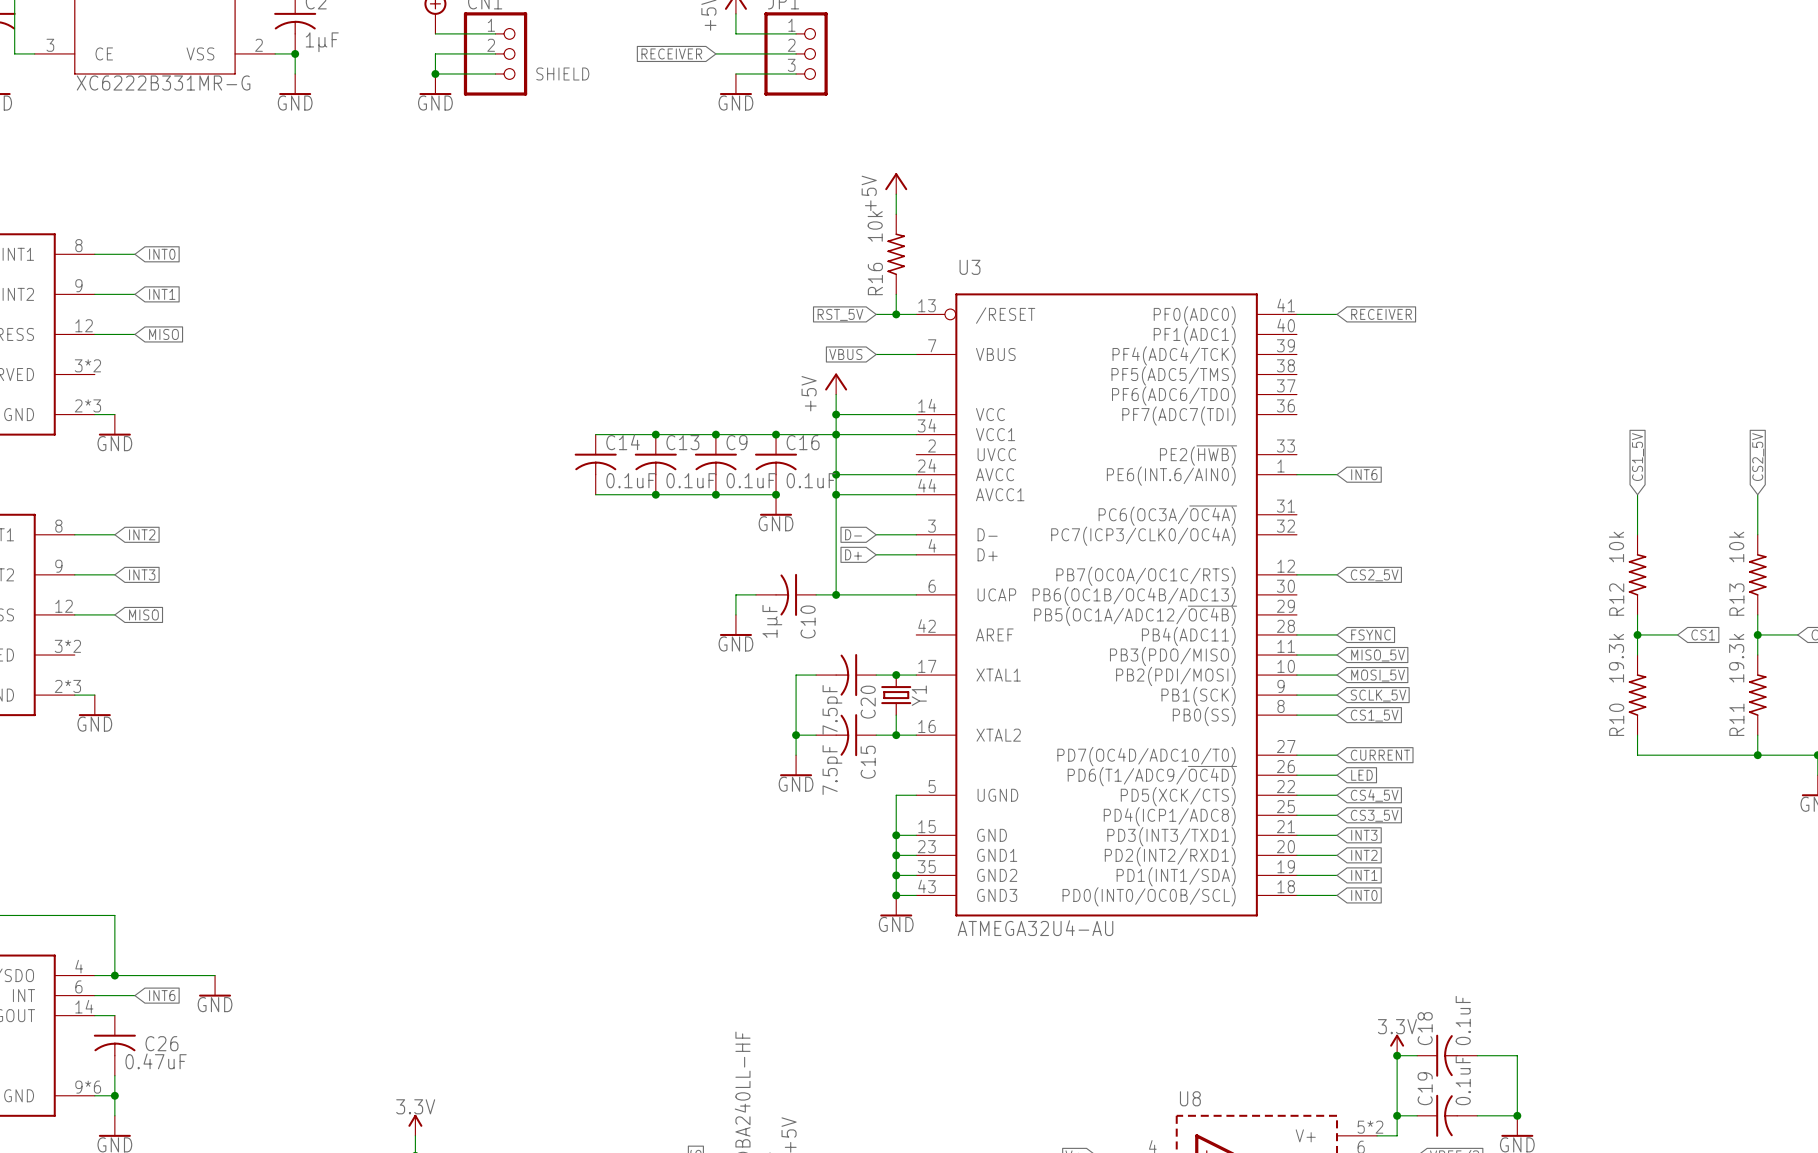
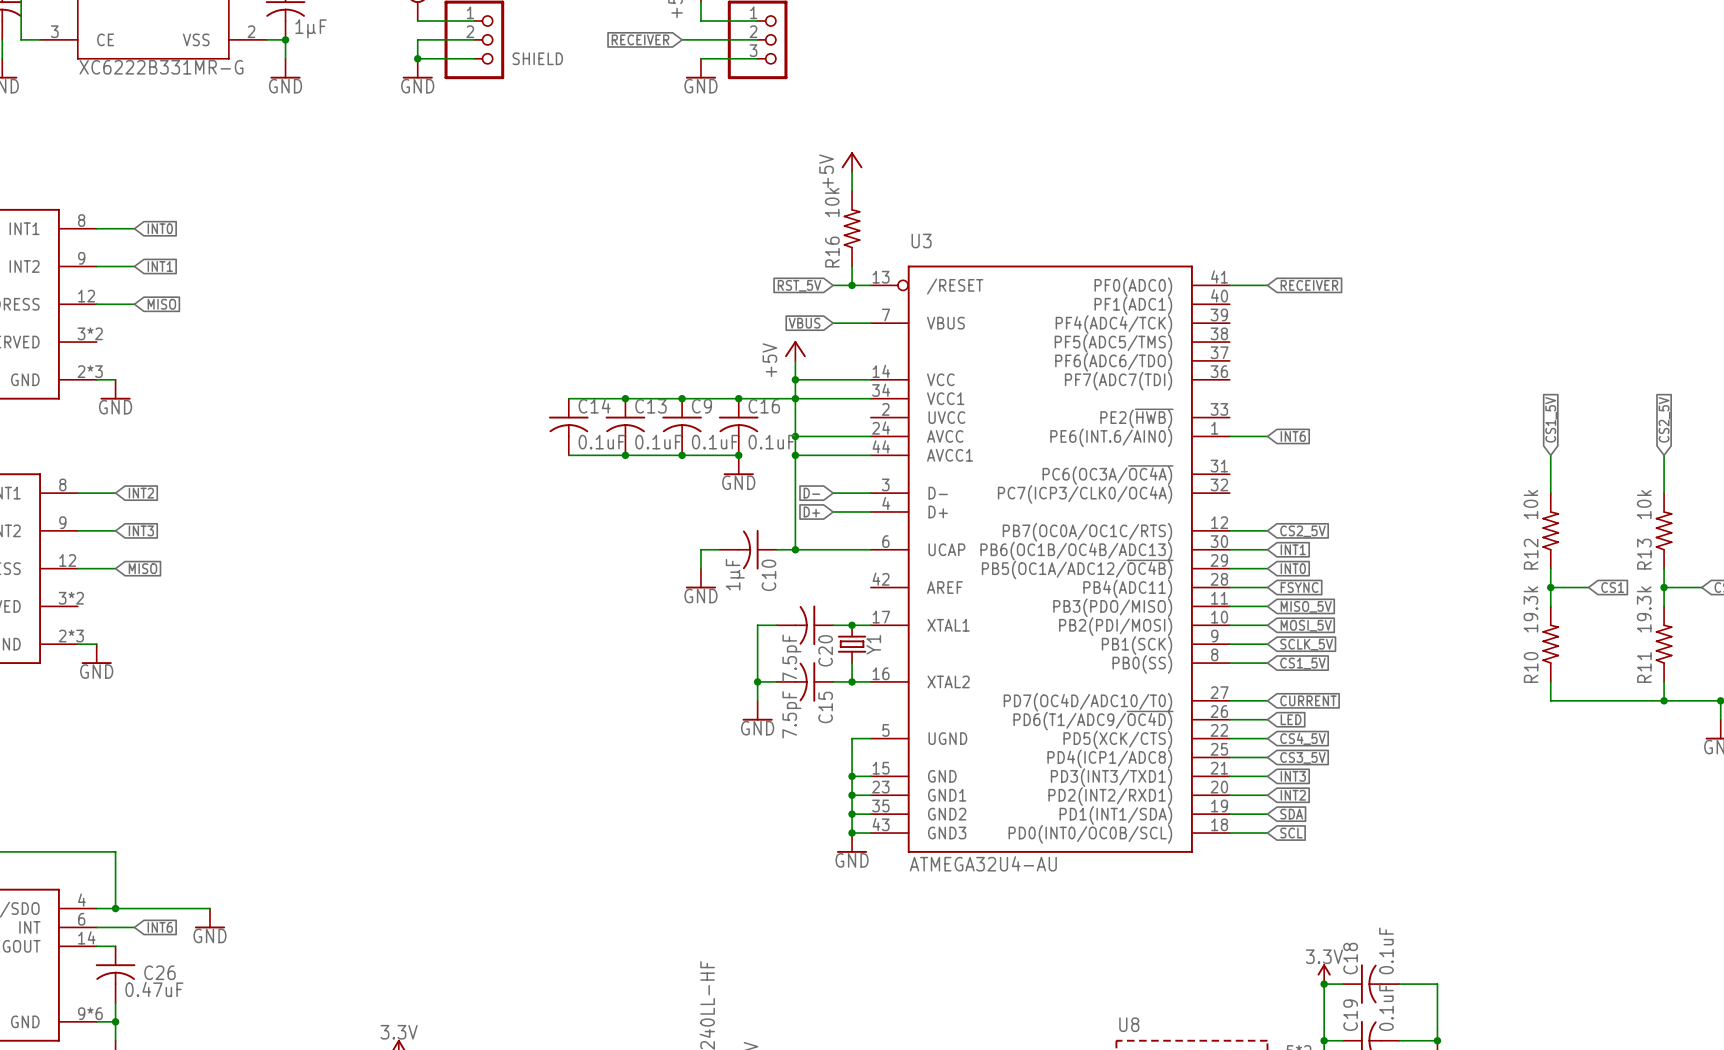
wire: none -> (1229, 549) (1267, 549)
global label: none -> INT1 (1293, 549)
wire: none -> (1229, 568) (1267, 568)
global label: none -> INT0 (1293, 568)
global label: INT1 (1364, 875) -> SDA (1291, 814)
global label: INT0 (1364, 895) -> SCL (1291, 833)

